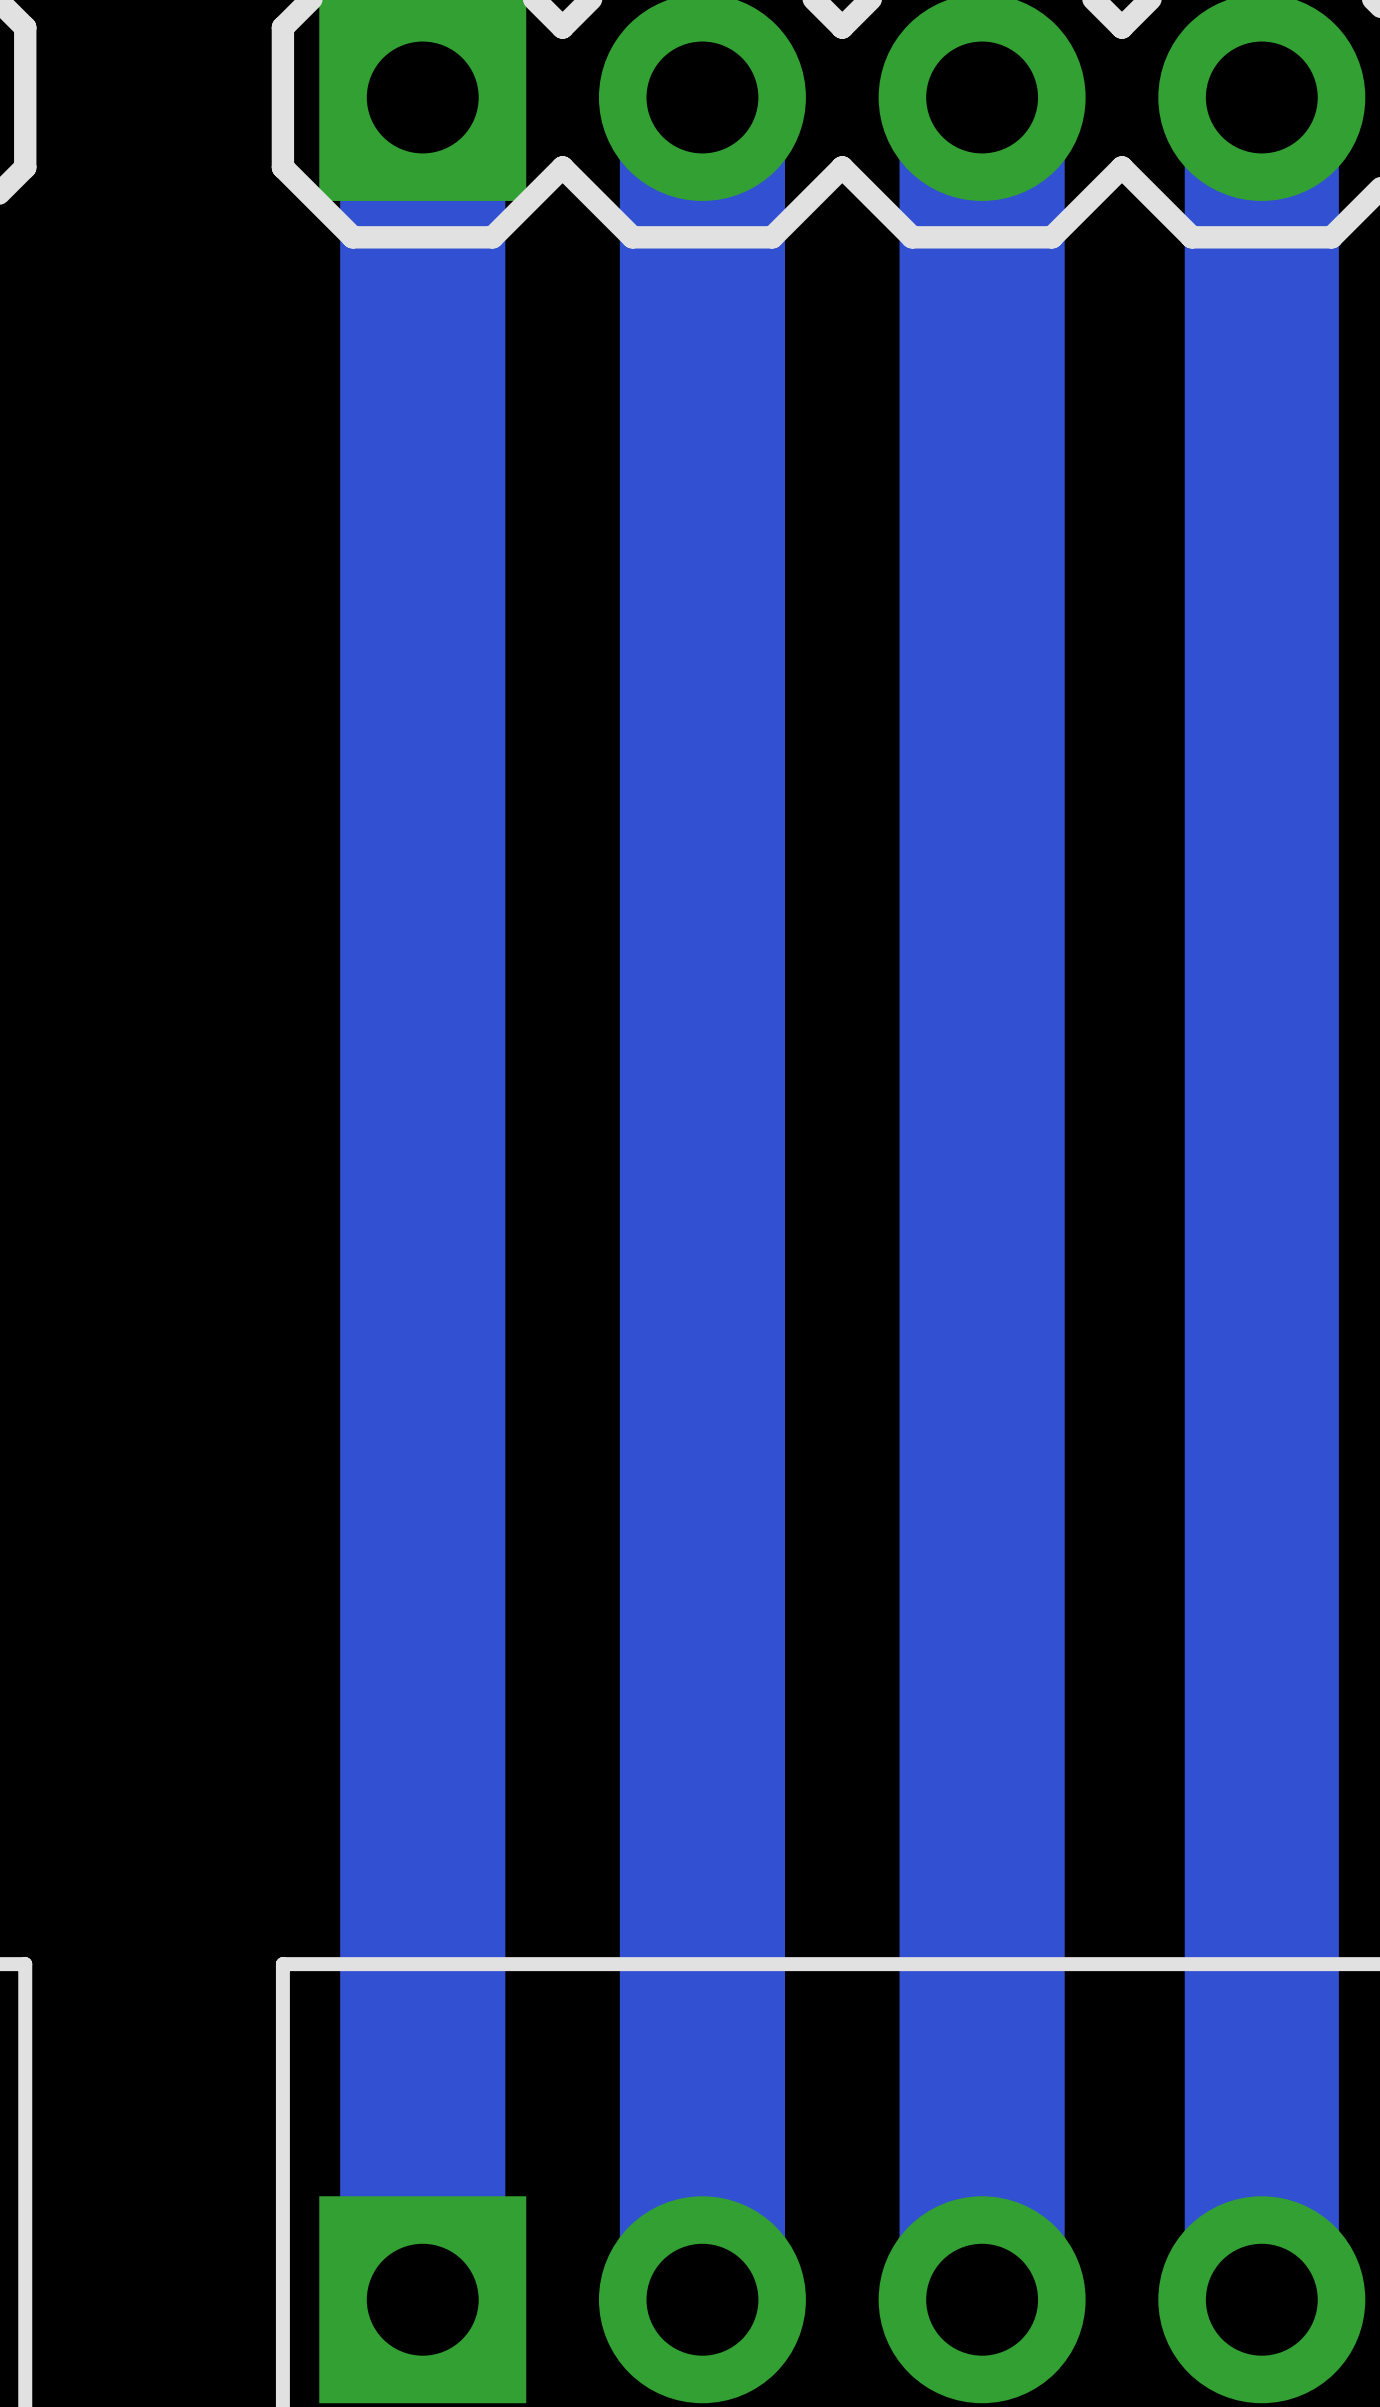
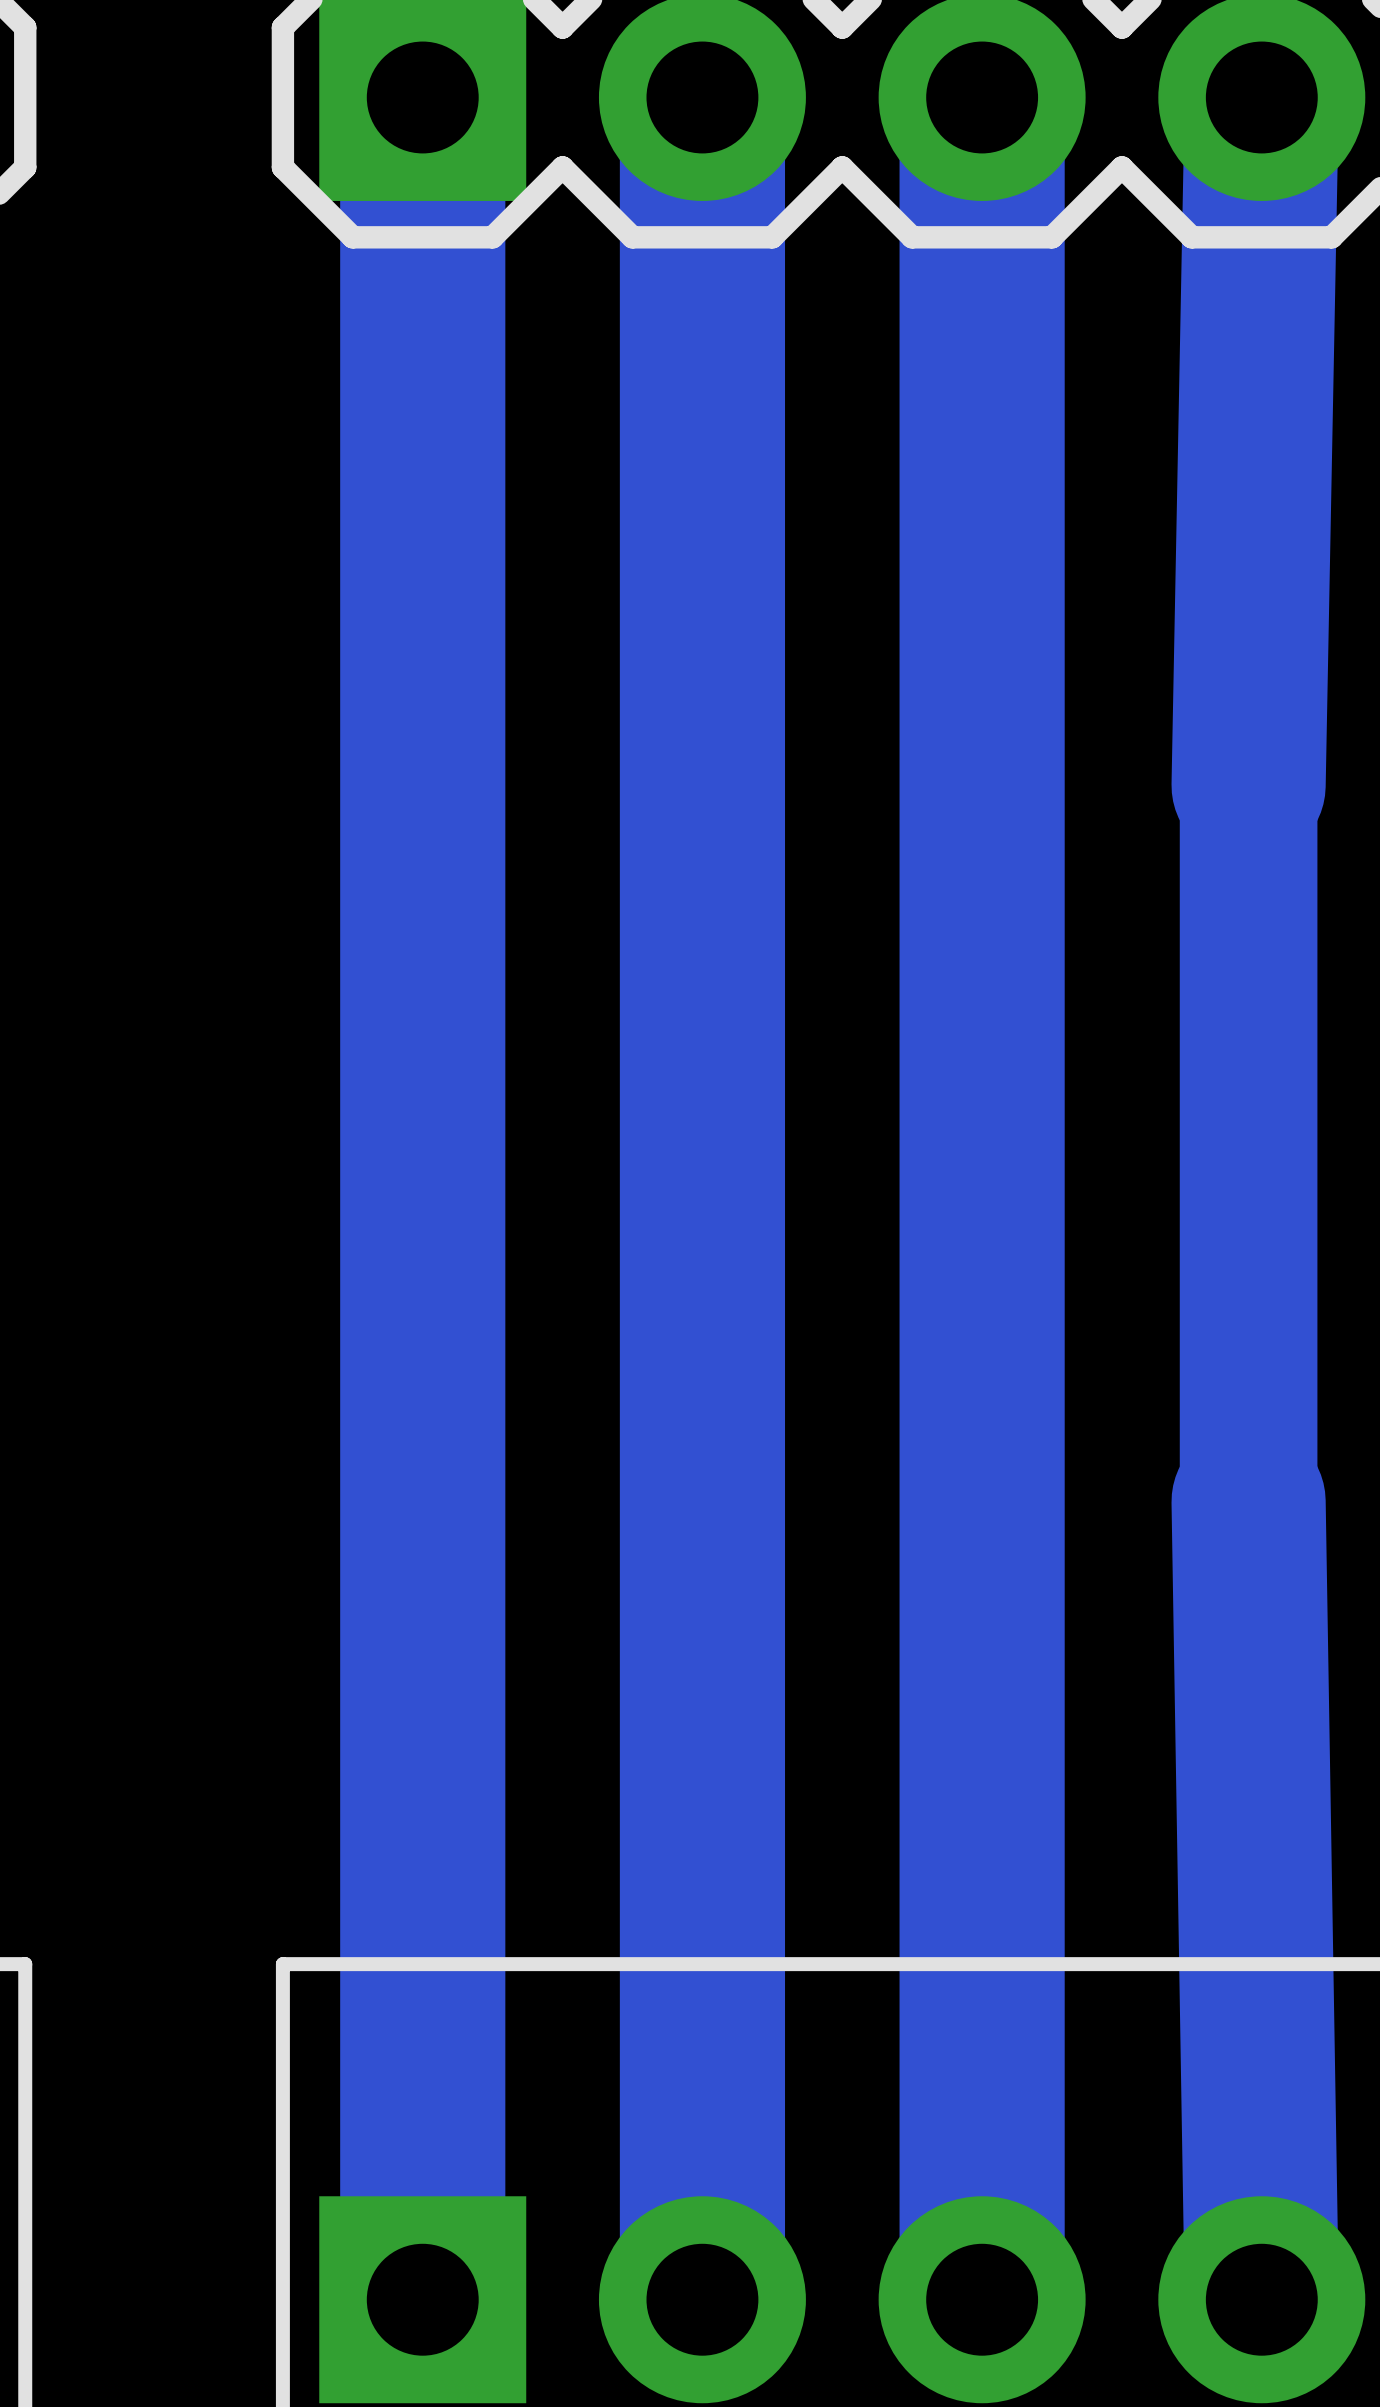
bottom track: (1261, 97) (1261, 2299) -> (1261, 97) (1248, 785) (1248, 1501) (1261, 2299)

